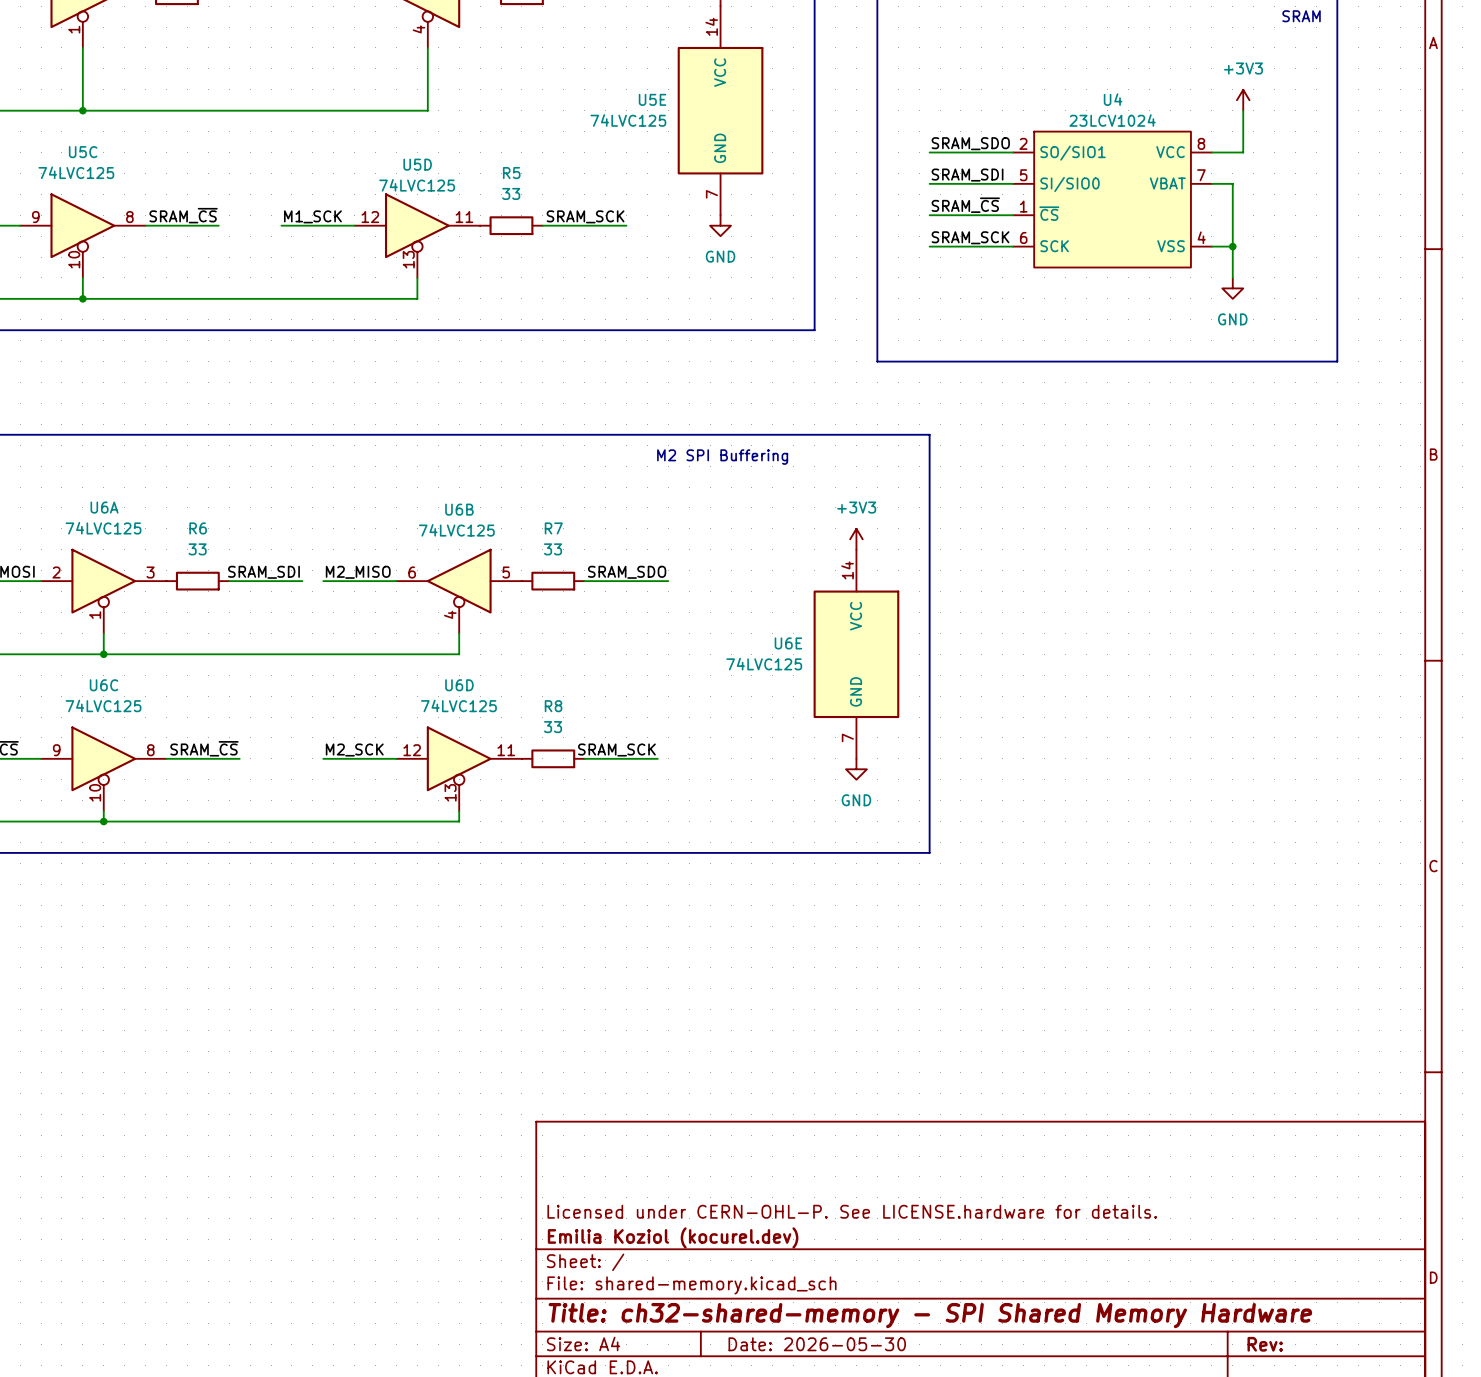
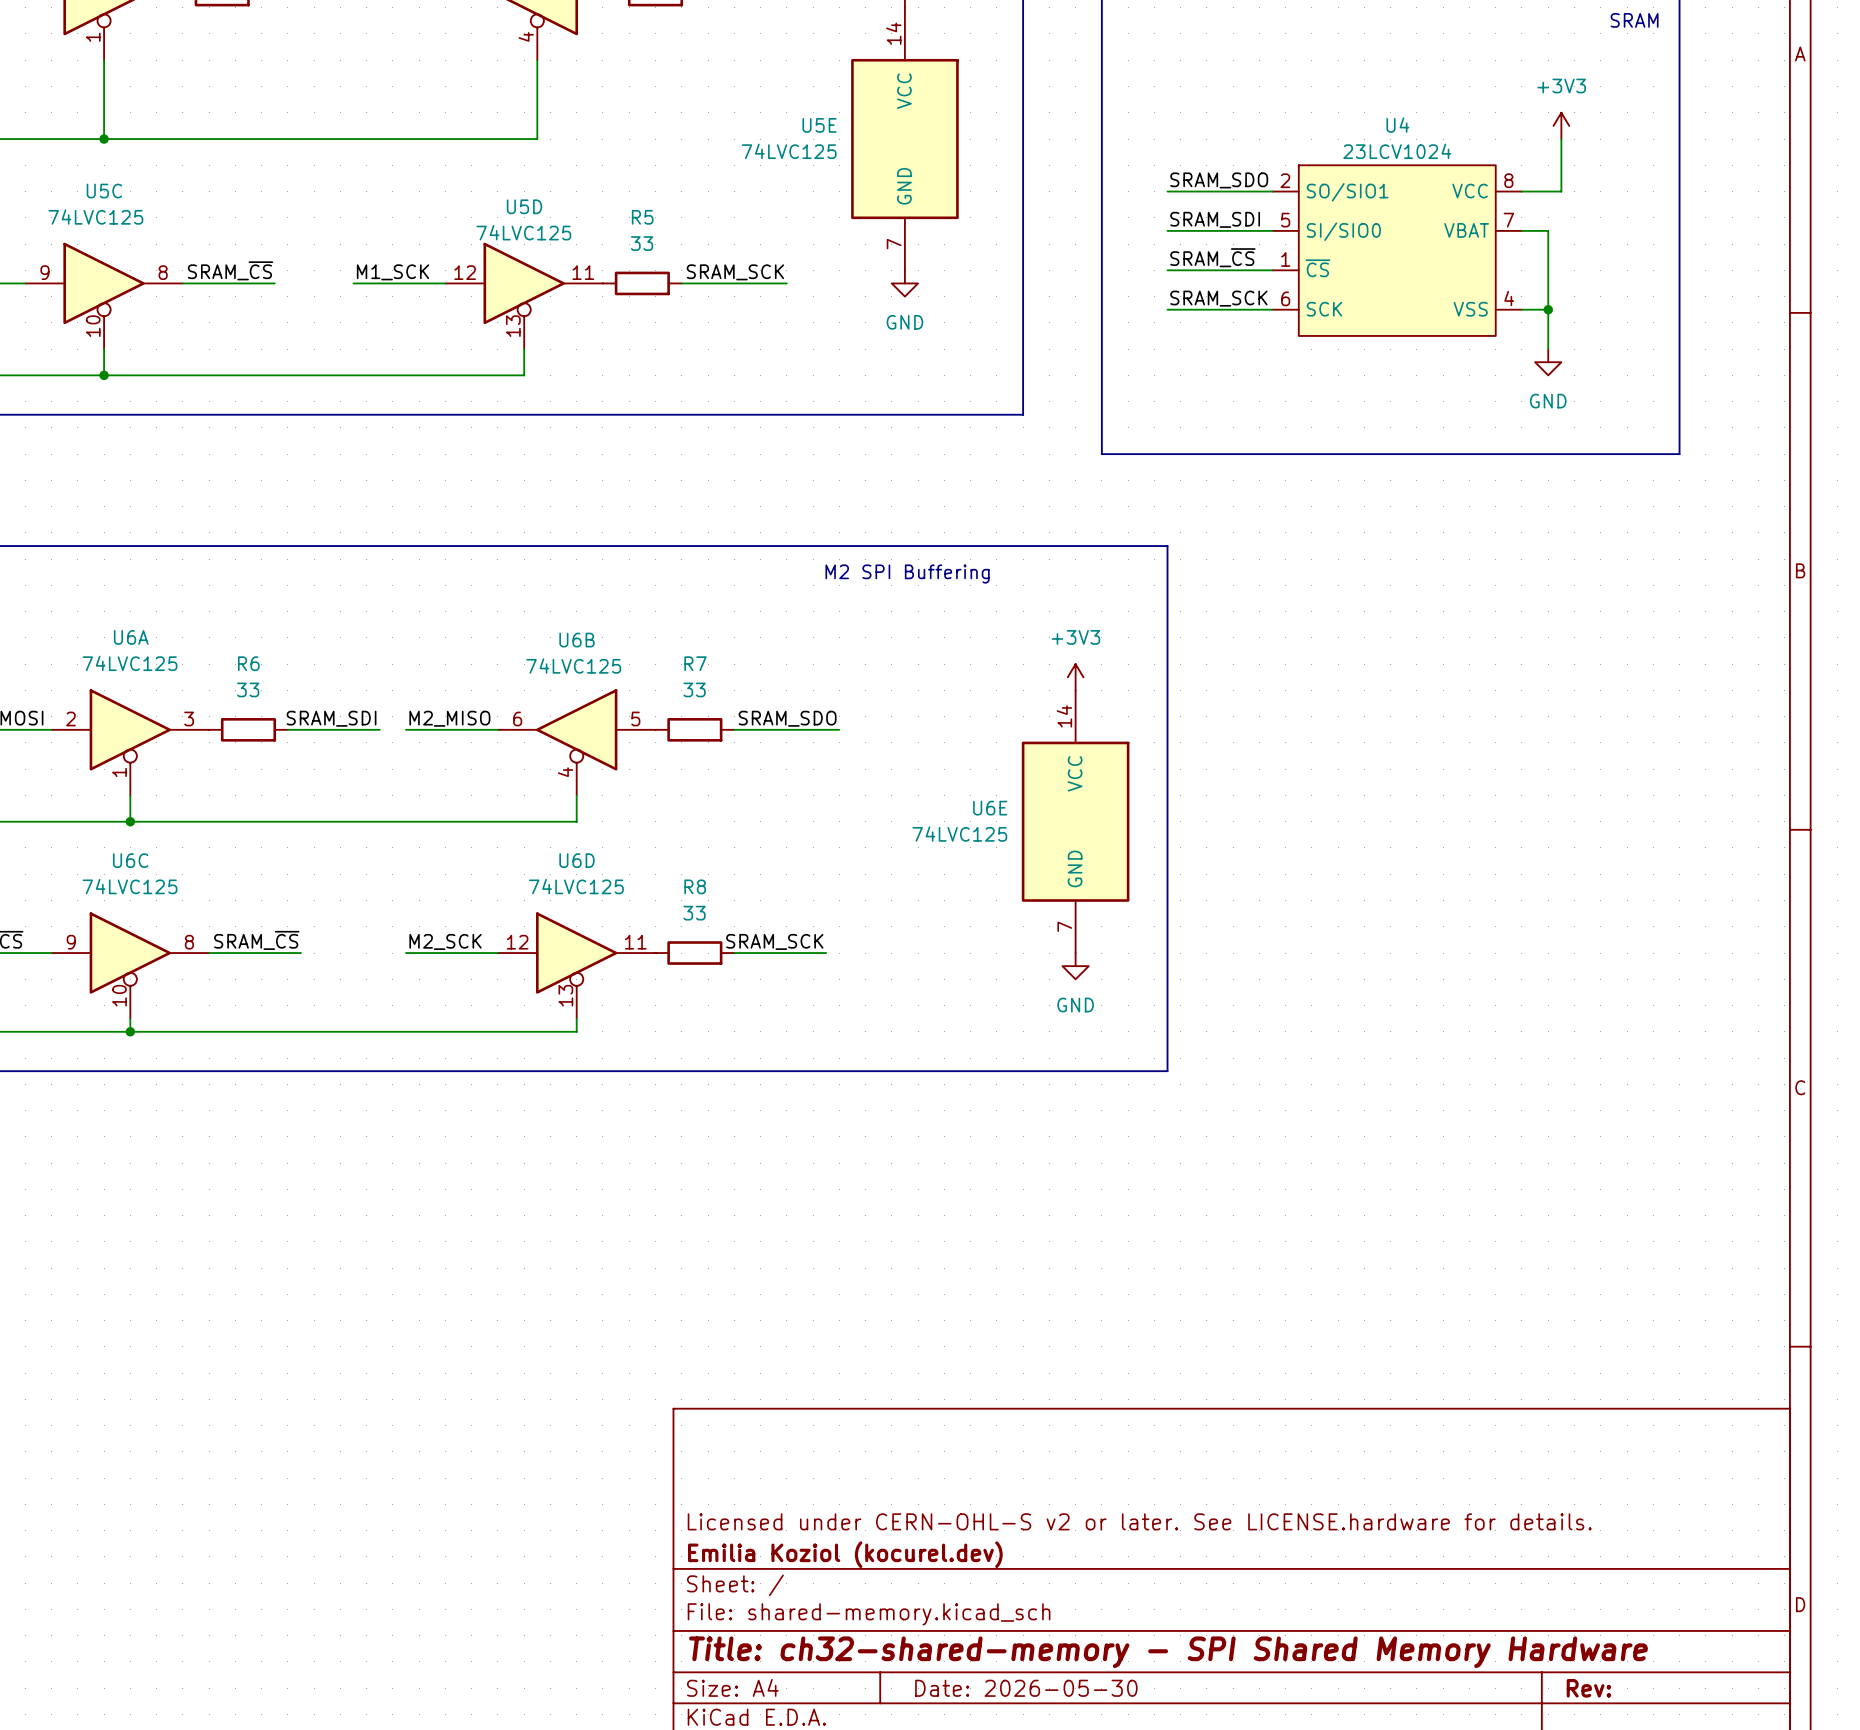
title block: Licensed under CERN-OHL-P. See LICENSE.hardware for details. (852, 1211) -> Licensed under CERN-OHL-S v2 or later. See LICENSE.hardware for details. (1139, 1521)

